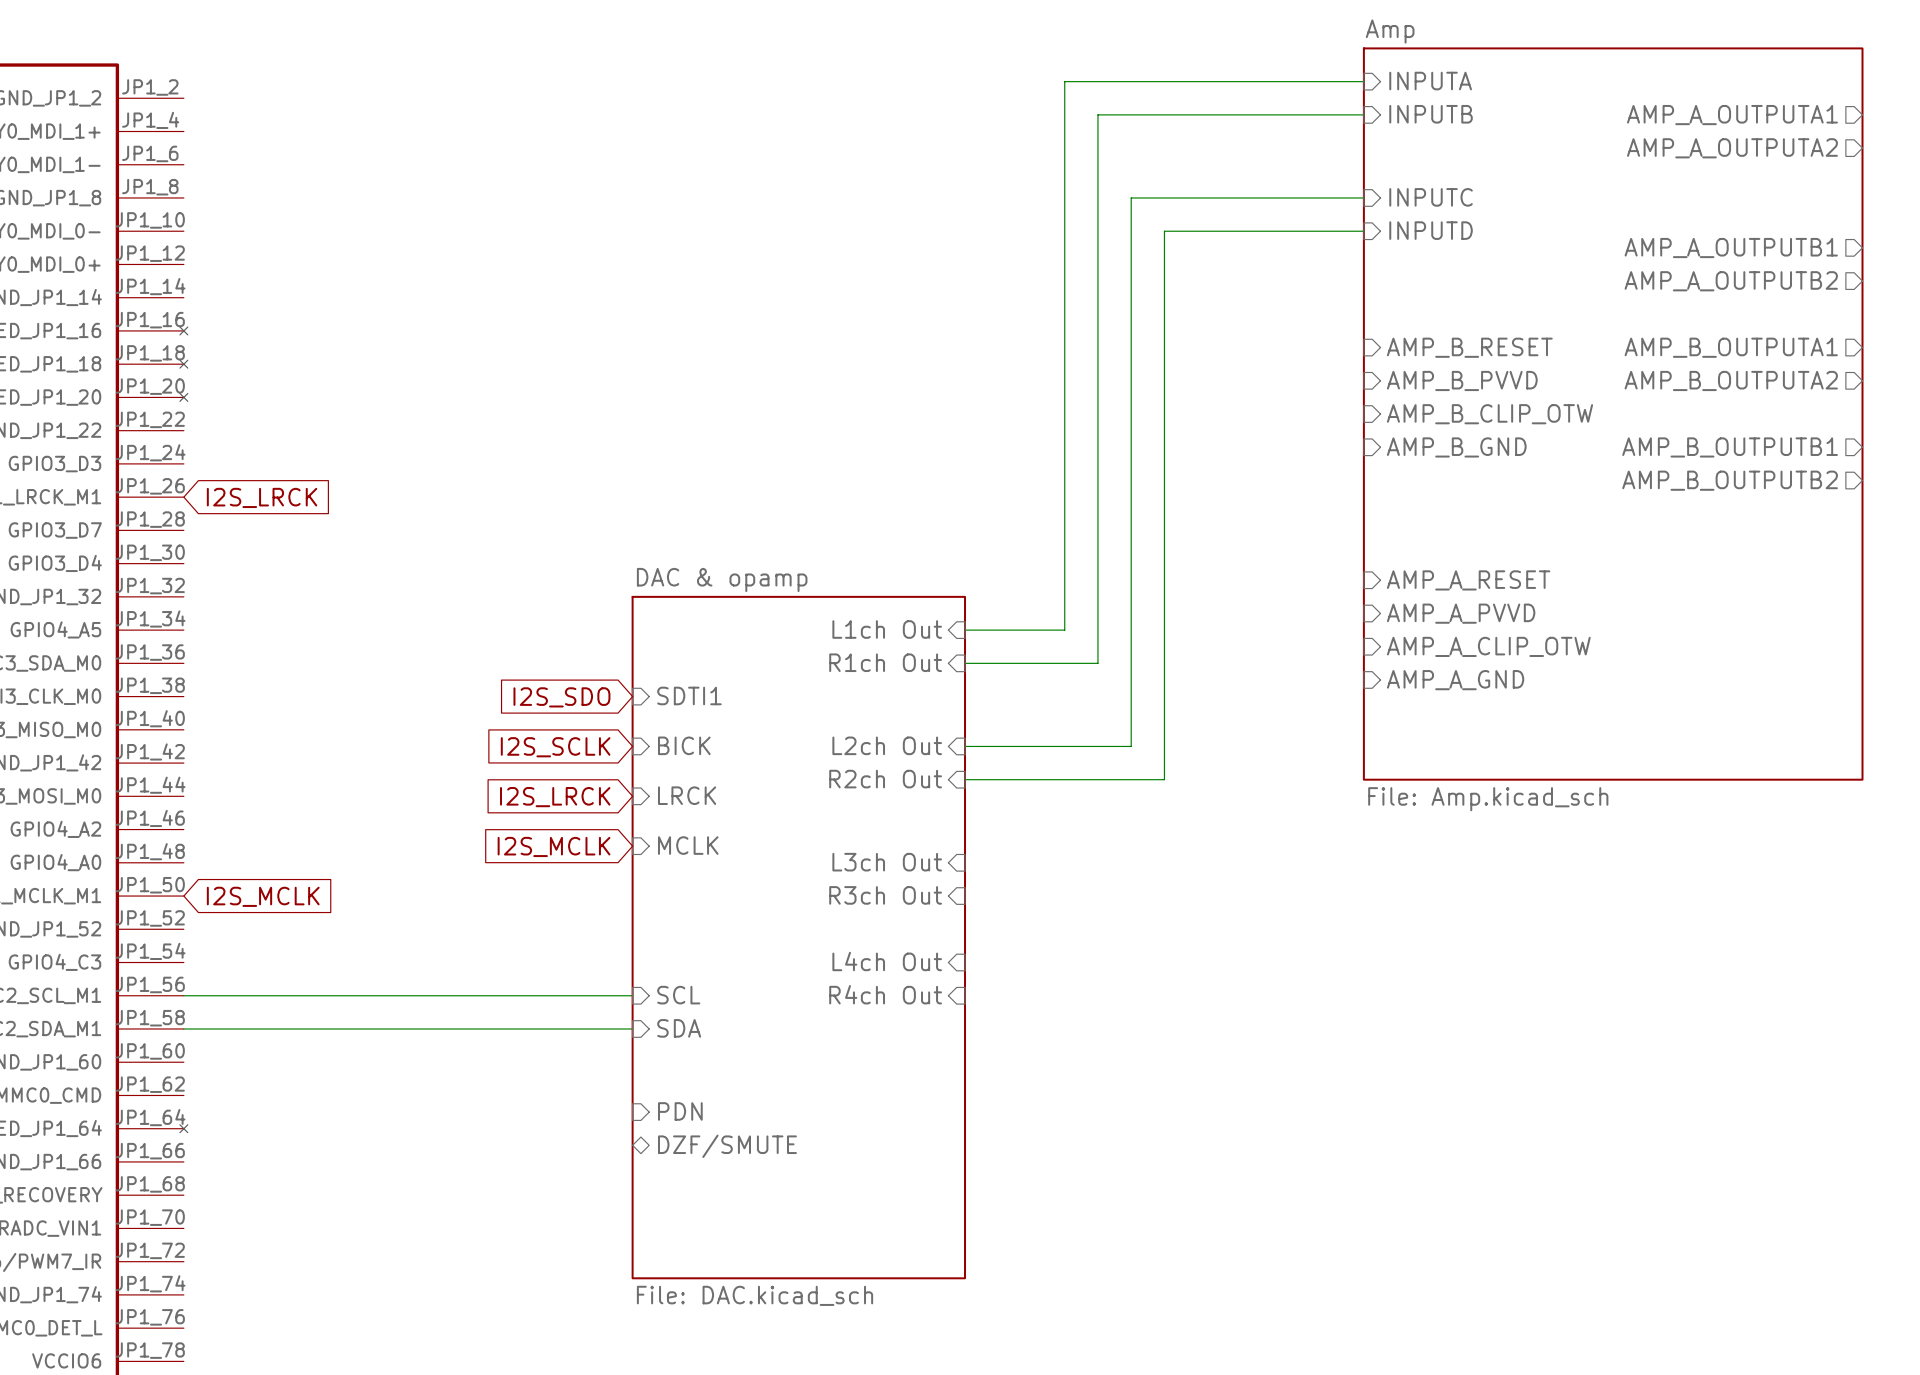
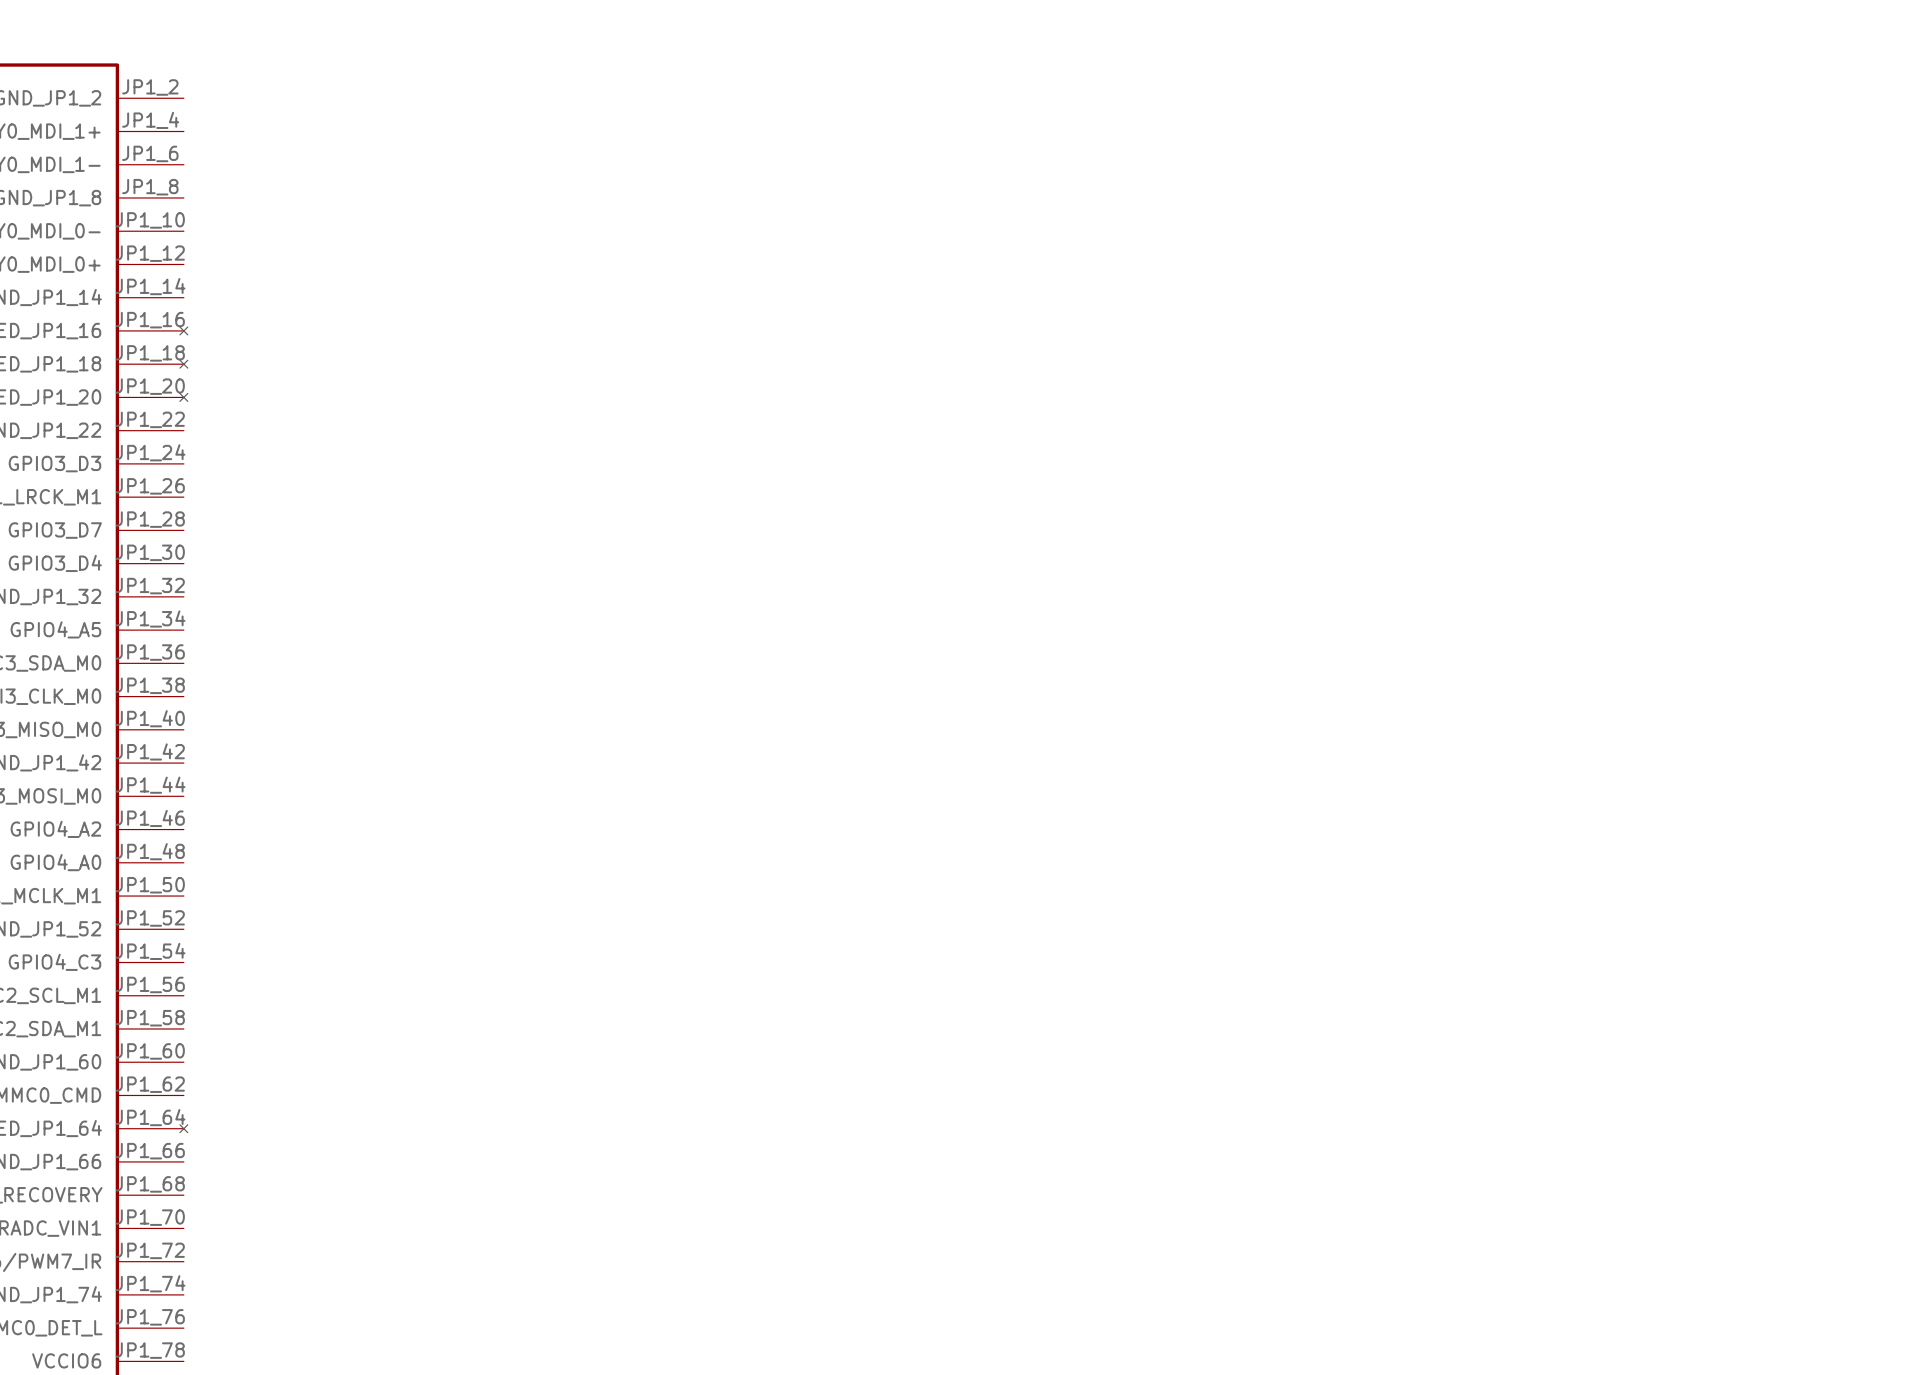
wire: (1363, 81) (1064, 81) (1064, 630) (965, 630) -> none
sheet pin: INPUTA (1430, 81) -> none
wire: (1363, 114) (1097, 114) (1097, 663) (965, 663) -> none
sheet pin: INPUTB (1431, 114) -> none
sheet pin: AMP_A_OUTPUTA1 (1732, 115) -> none
sheet pin: AMP_A_OUTPUTA2 (1732, 148) -> none
wire: (1363, 197) (1131, 197) (1131, 746) (965, 746) -> none
sheet pin: INPUTC (1431, 197) -> none
sheet pin: INPUTD (1431, 230) -> none
wire: (1363, 231) (1164, 231) (1164, 779) (965, 779) -> none
sheet pin: AMP_A_OUTPUTB1 (1731, 248) -> none
sheet pin: AMP_A_OUTPUTB2 (1731, 281) -> none
sheet pin: AMP_B_RESET (1469, 347) -> none
sheet pin: AMP_B_OUTPUTA1 (1731, 347) -> none
sheet pin: AMP_B_PVVD (1462, 380) -> none
sheet pin: AMP_B_OUTPUTA2 (1731, 380) -> none
sheet pin: AMP_B_CLIP_OTW (1489, 414) -> none
sheet Amp: File: Amp.kicad_sch (1613, 414) -> none
sheet pin: AMP_B_GND (1456, 447) -> none
sheet pin: AMP_B_OUTPUTB1 (1730, 447) -> none
sheet pin: AMP_B_OUTPUTB2 (1730, 480) -> none
global label: I2S_LRCK (262, 497) -> none
sheet pin: AMP_A_RESET (1468, 580) -> none
sheet pin: AMP_A_PVVD (1461, 613) -> none
sheet pin: L1ch Out (887, 629) -> none
sheet pin: AMP_A_CLIP_OTW (1488, 646) -> none
sheet pin: R1ch Out (885, 662) -> none
sheet pin: AMP_A_GND (1455, 680) -> none
sheet pin: SDTI1 (689, 695) -> none
global label: I2S_SDO (561, 697) -> none
sheet pin: BICK (684, 745) -> none
sheet pin: L2ch Out (887, 745) -> none
global label: I2S_SCLK (555, 747) -> none
sheet pin: R2ch Out (885, 779) -> none
sheet pin: LRCK (687, 795) -> none
global label: I2S_LRCK (555, 797) -> none
sheet pin: MCLK (688, 845) -> none
global label: I2S_MCLK (554, 846) -> none
sheet pin: L3ch Out (887, 862) -> none
sheet pin: R3ch Out (885, 895) -> none
global label: I2S_MCLK (263, 896) -> none
sheet DAC & opamp: File: DAC.kicad_sch (798, 937) -> none
sheet pin: L4ch Out (887, 961) -> none
sheet pin: R4ch Out (885, 994) -> none
wire: (183, 995) (632, 995) -> none
sheet pin: SCL (678, 995) -> none
wire: (183, 1028) (632, 1028) -> none
sheet pin: SDA (679, 1028) -> none
sheet pin: PDN (680, 1111) -> none
sheet pin: DZF/SMUTE (727, 1146) -> none

